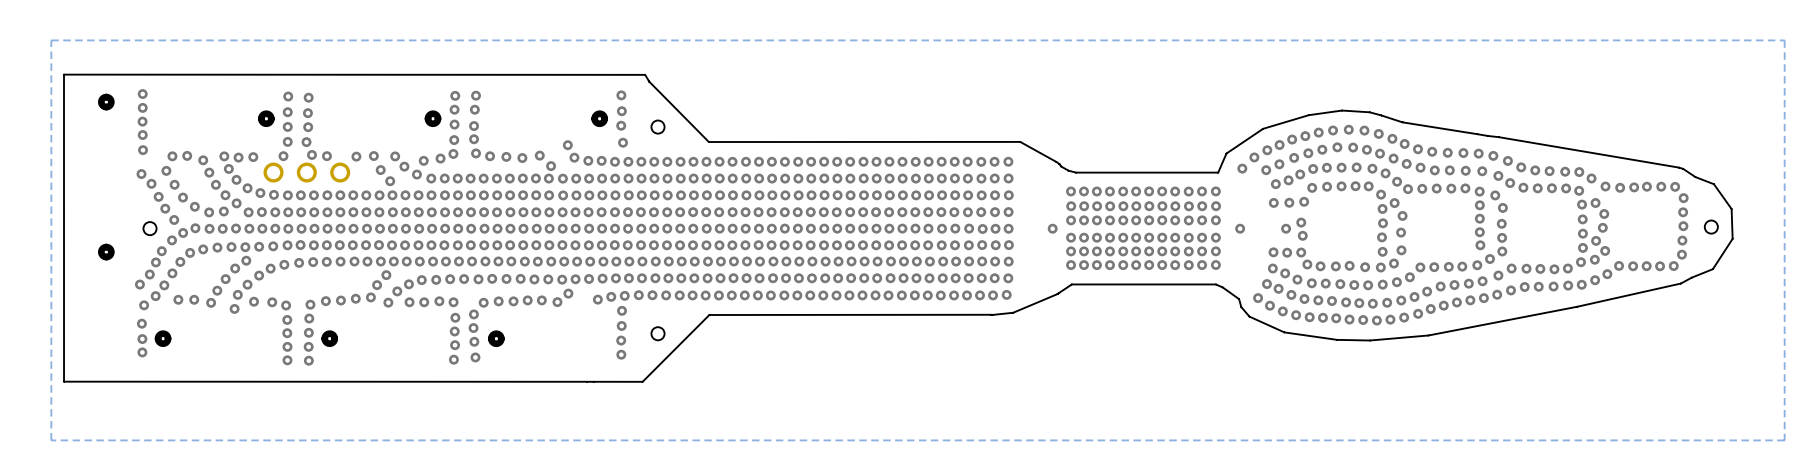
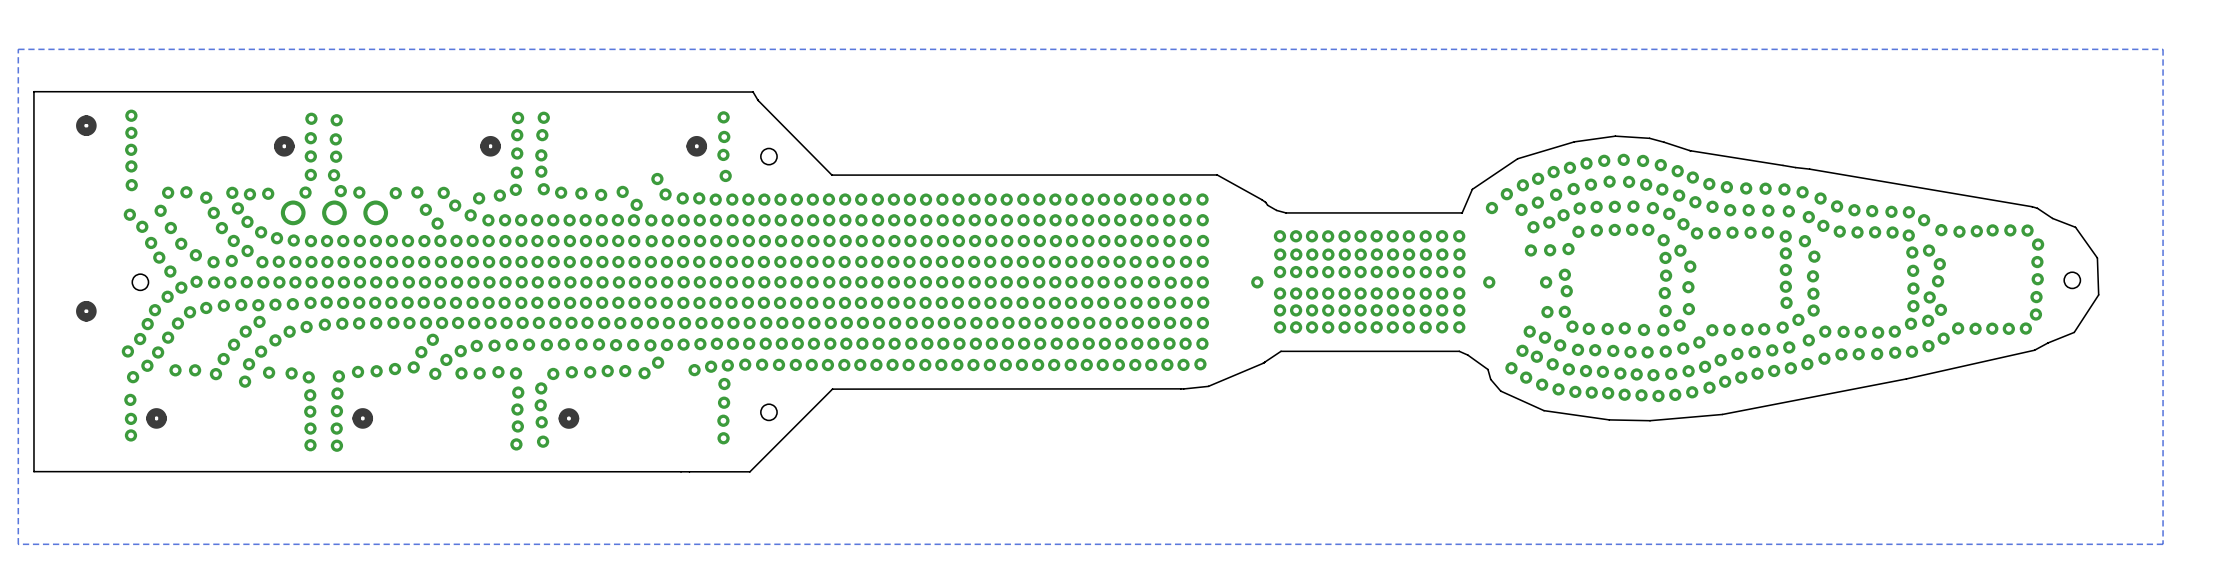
via: (1273, 252) -> none

